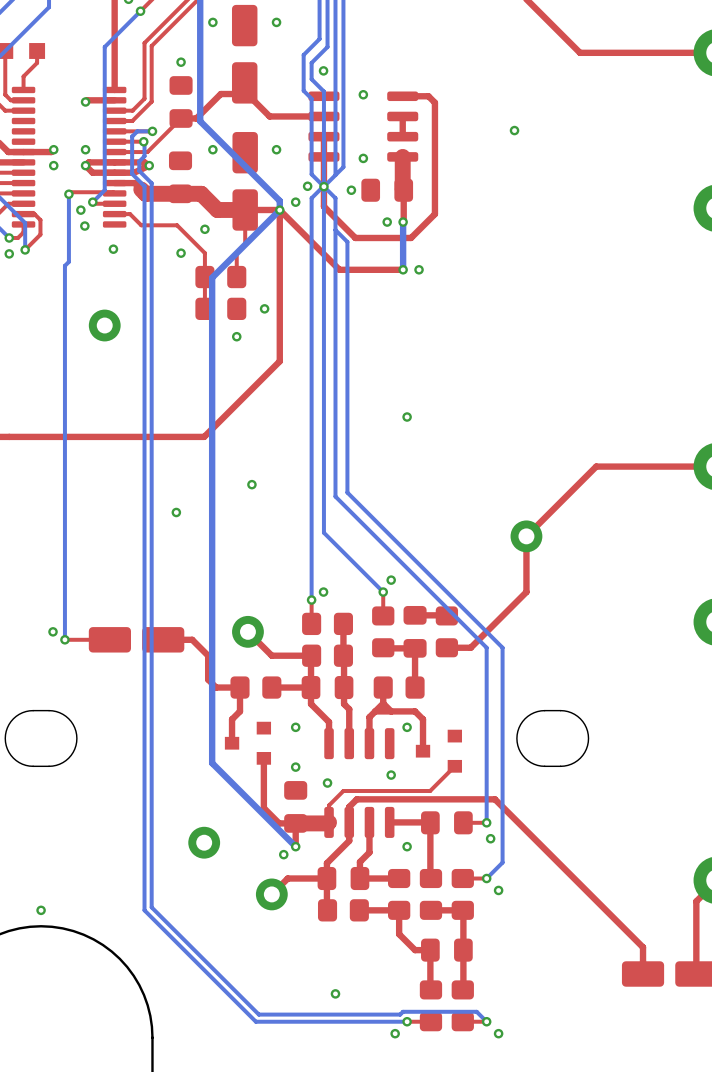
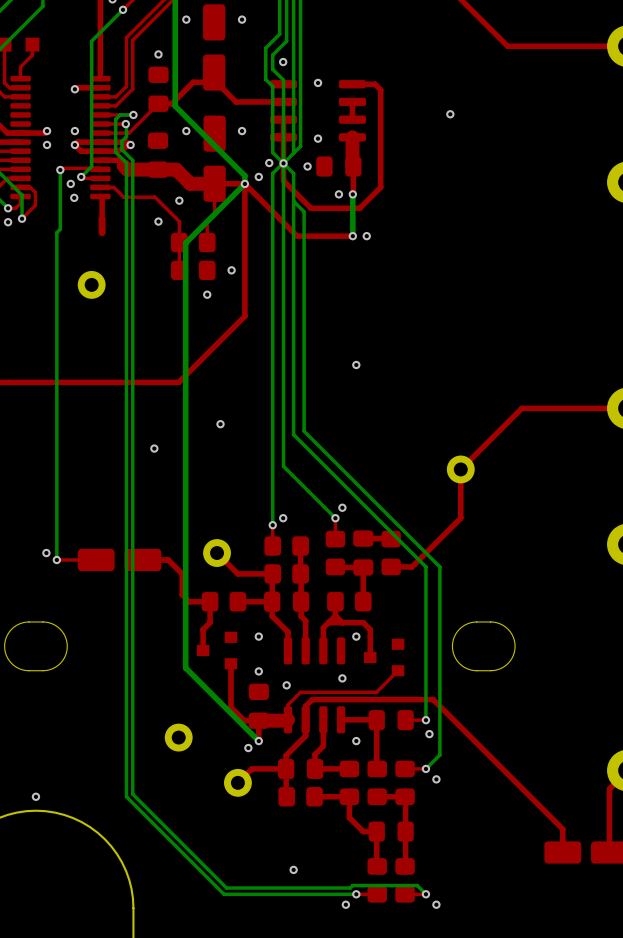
top track: none -> (100, 196) (102, 198) (102, 218)
via: (113, 249) -> none
part: none -> (102, 225)

